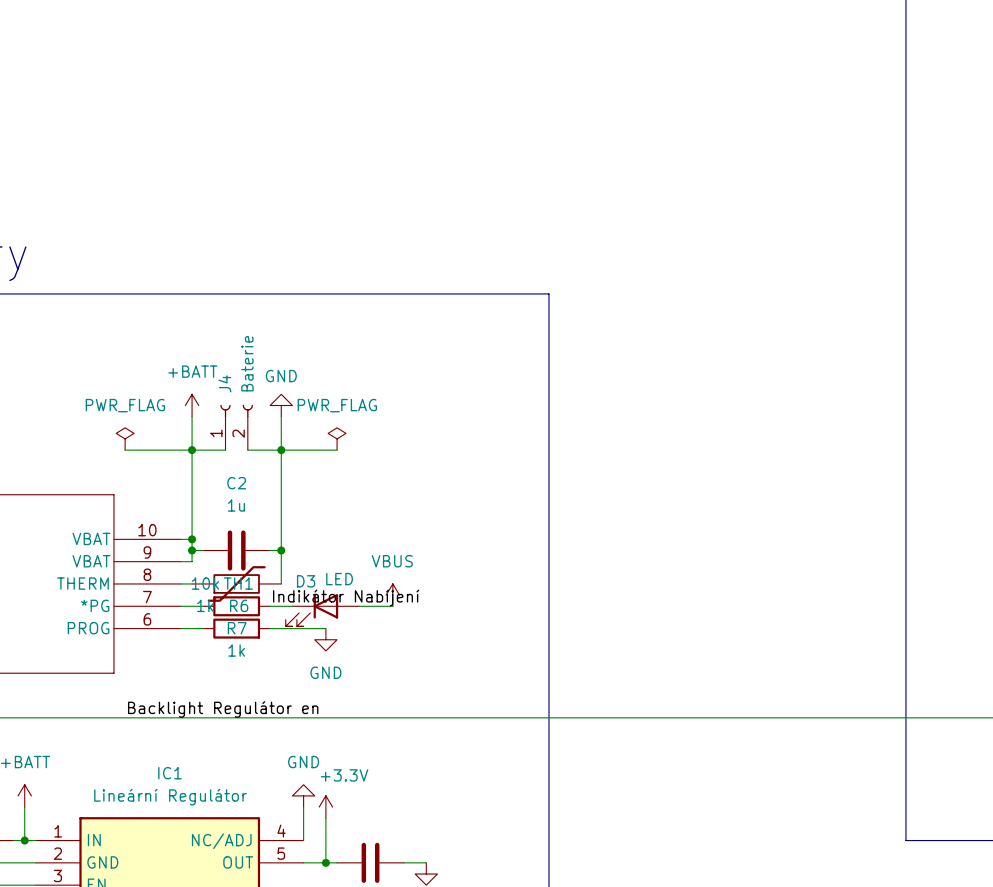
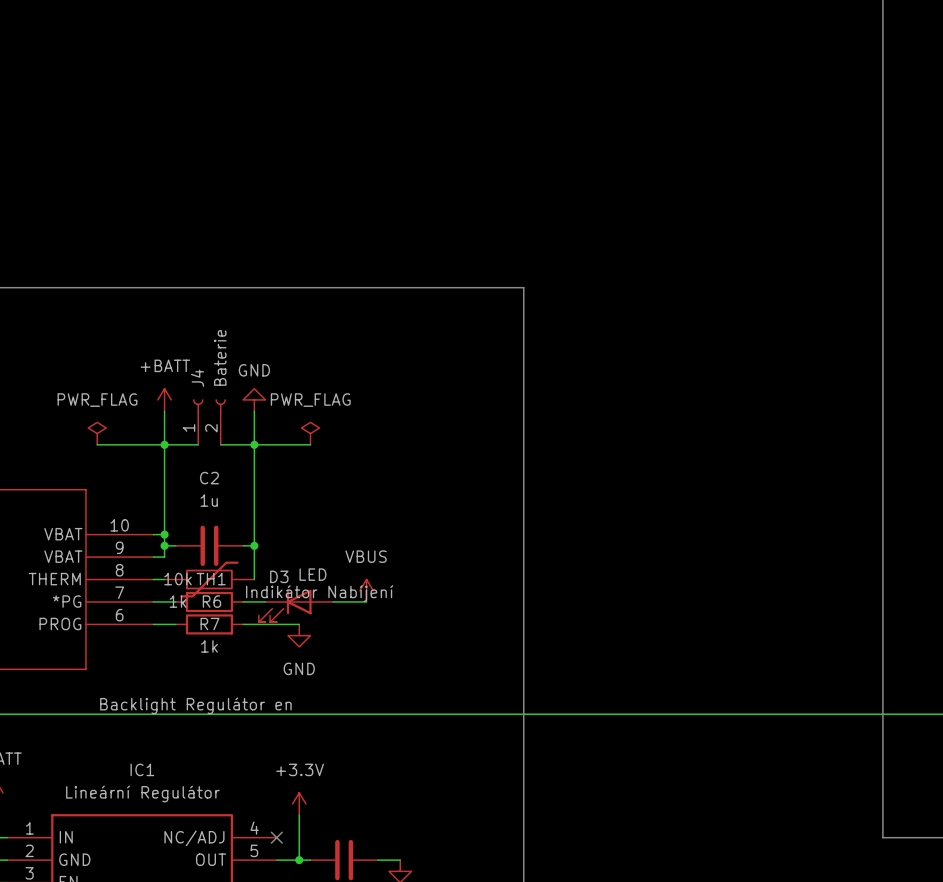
power symbol text position: +3.3V (344, 775) -> +3.3V (300, 769)
power symbol: GND (303, 795) -> none
wire: (303, 807) (303, 840) -> none
no-connect mark: none -> (276, 837)

